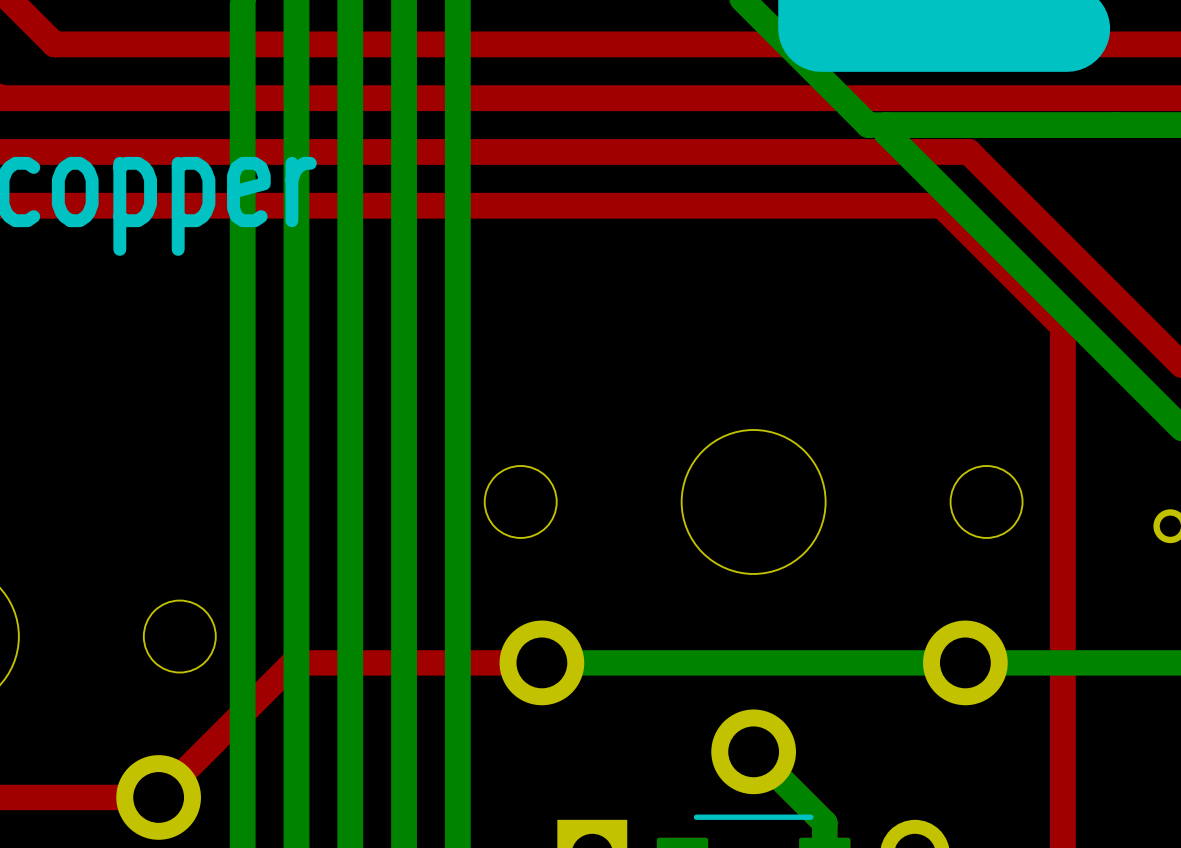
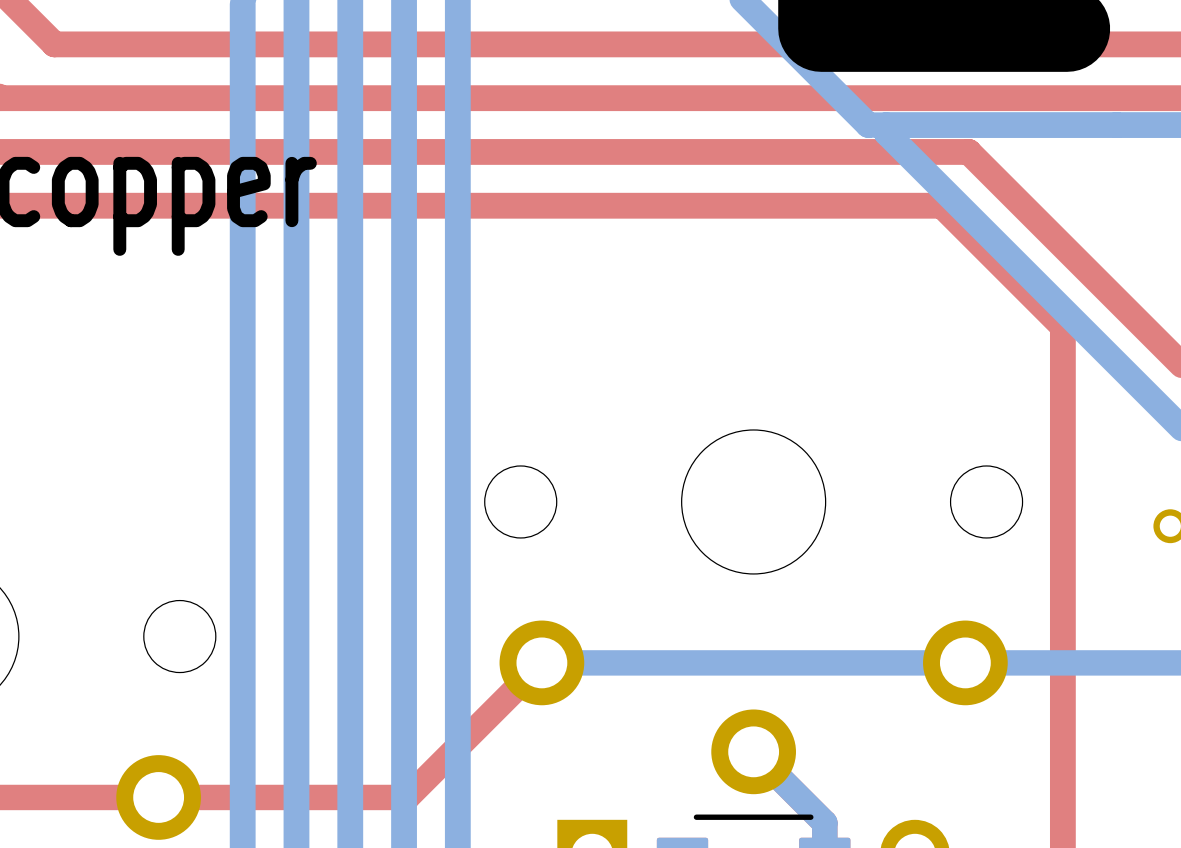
top track: (541, 662) (293, 662) (158, 797) -> (541, 662) (407, 797) (158, 797)

